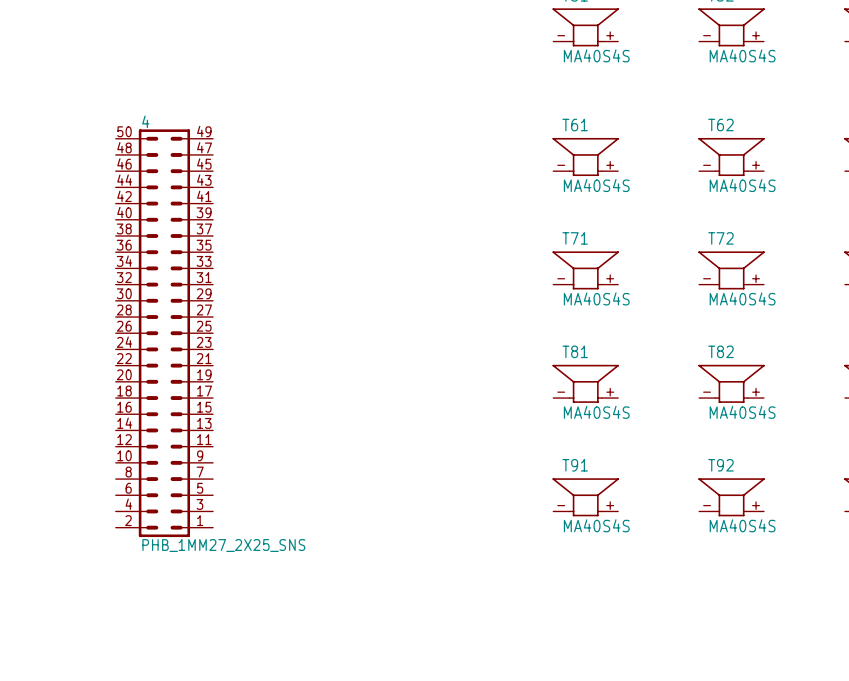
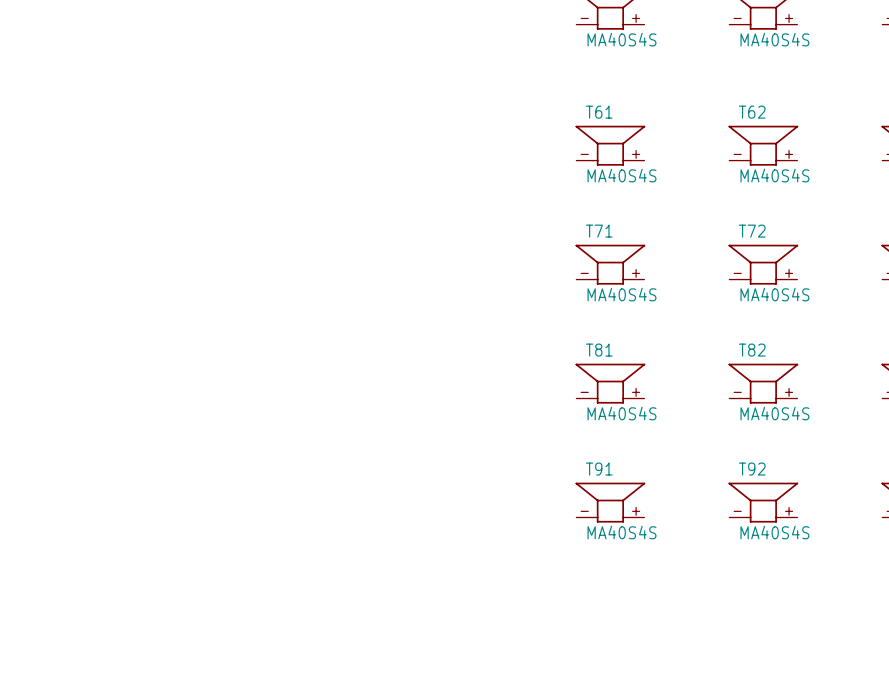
4: PHB_1MM27_2X25_SNS (164, 333) -> none

